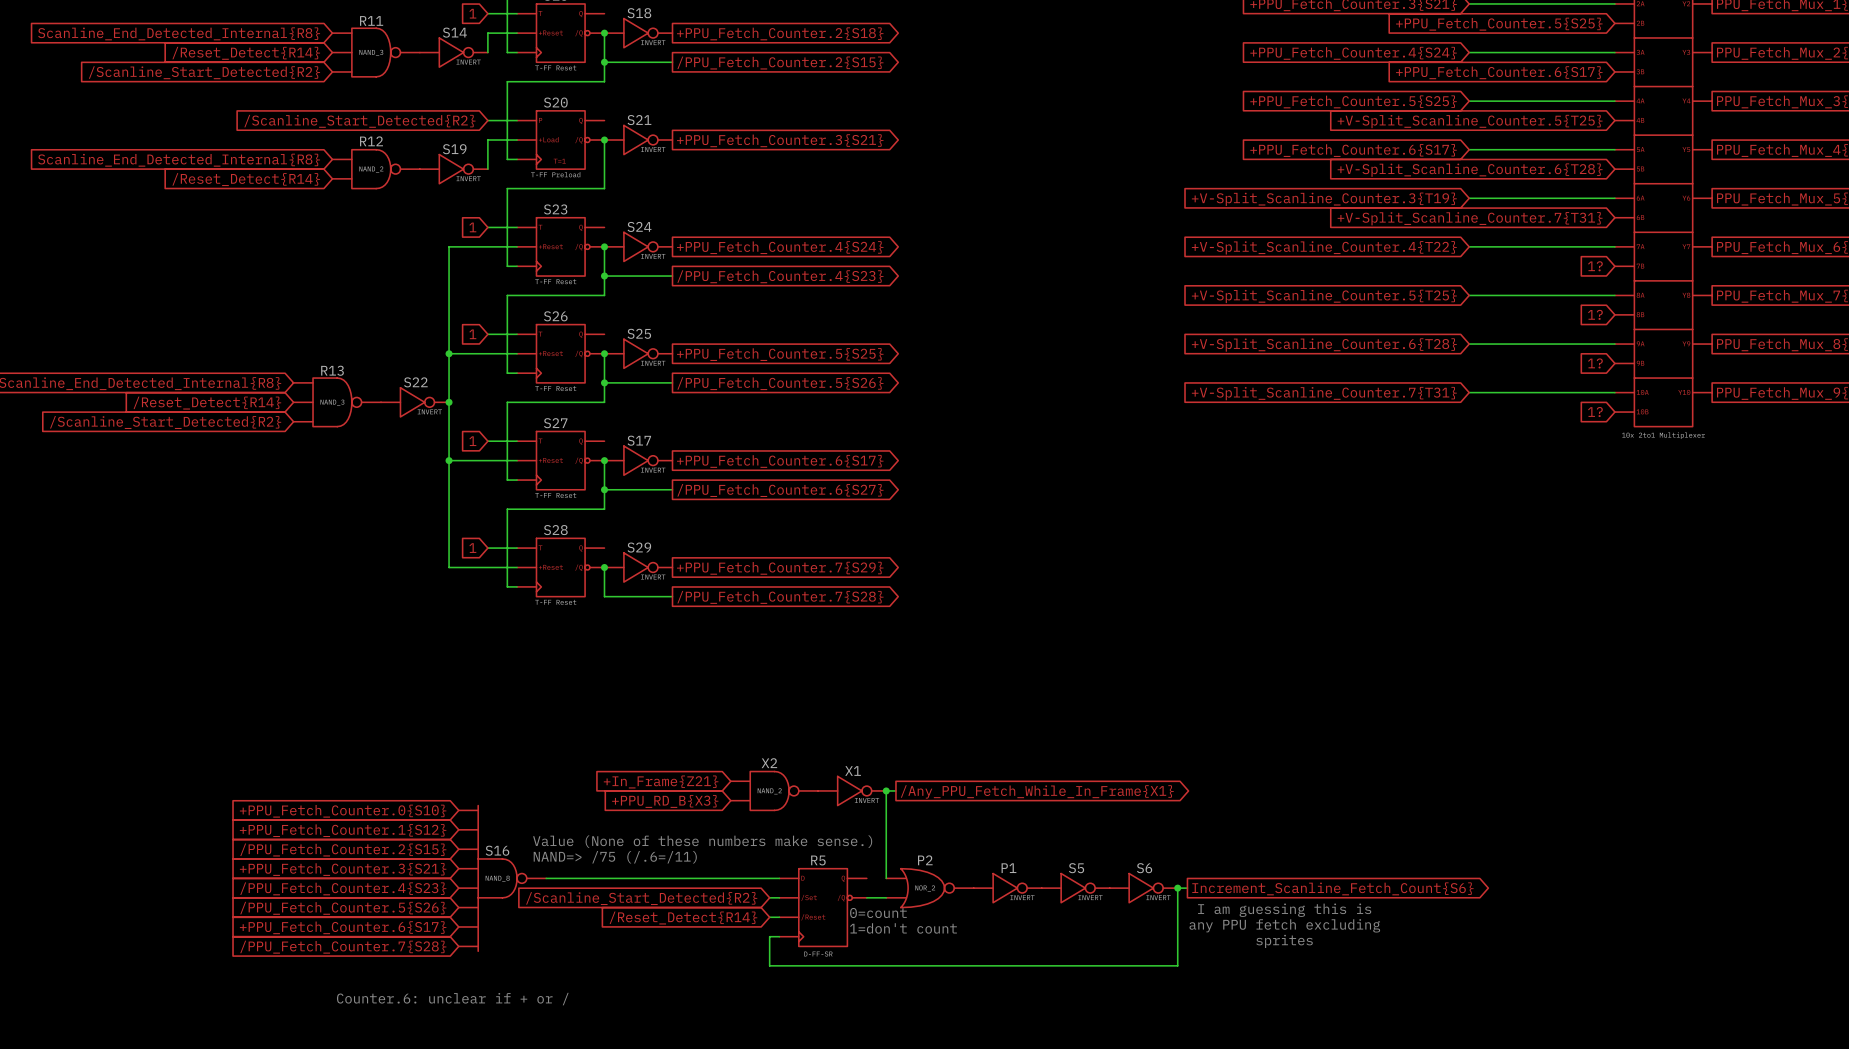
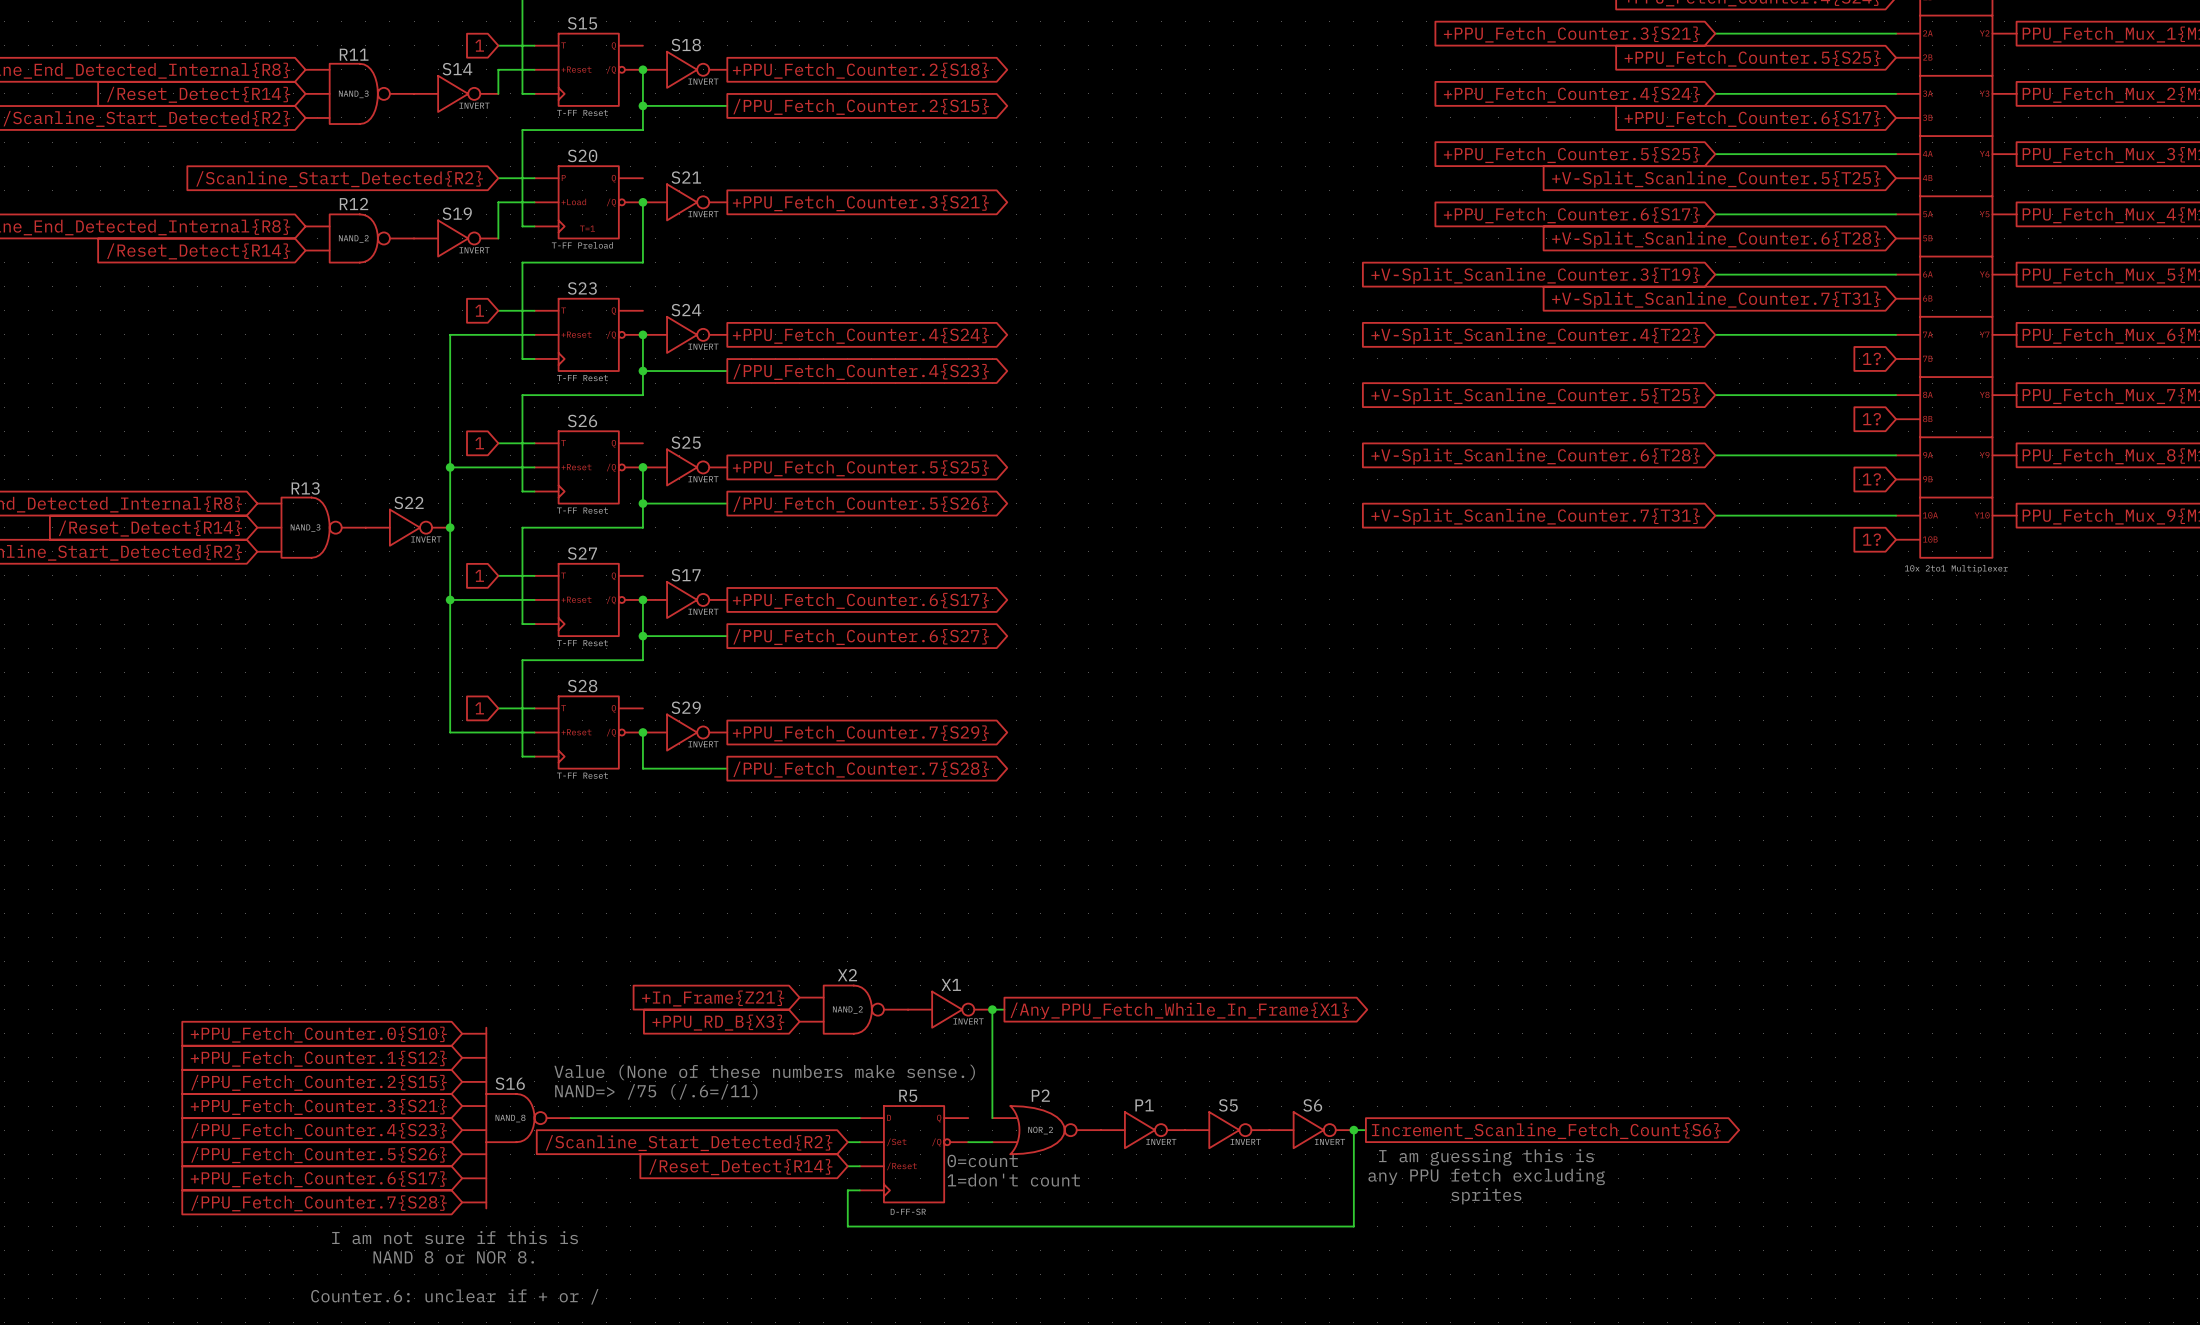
text: none -> I am not sure if this is (455, 1237)
text: none -> NAND 8 or NOR 8. (453, 1257)
text position: Counter.6: unclear if + or / (452, 999) -> Counter.6: unclear if + or / (454, 1296)

